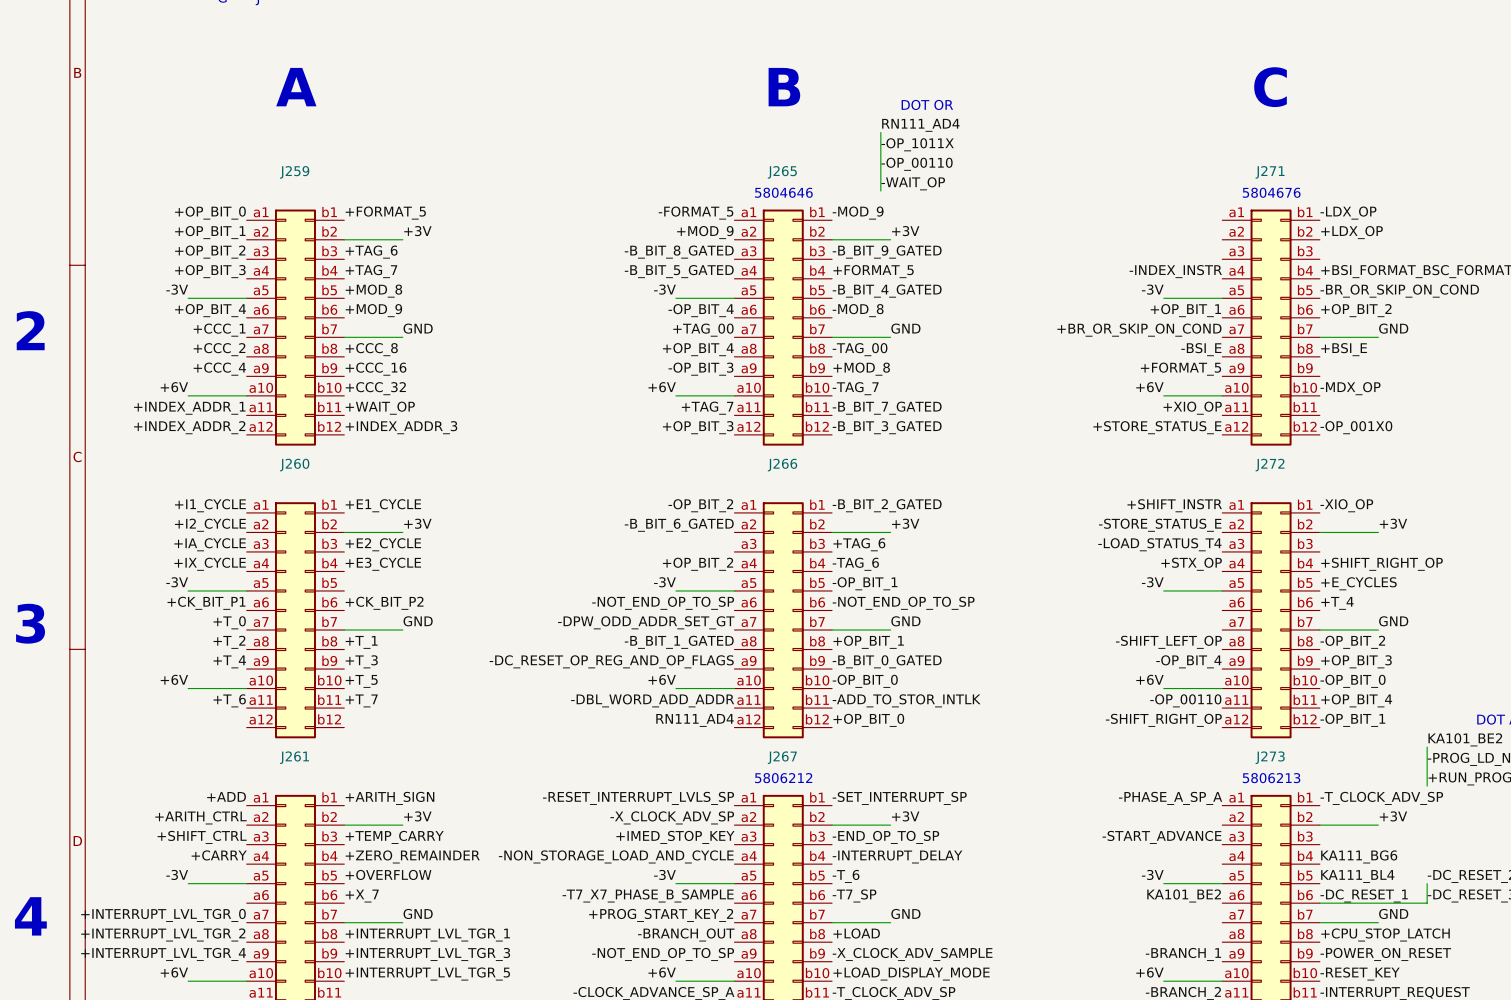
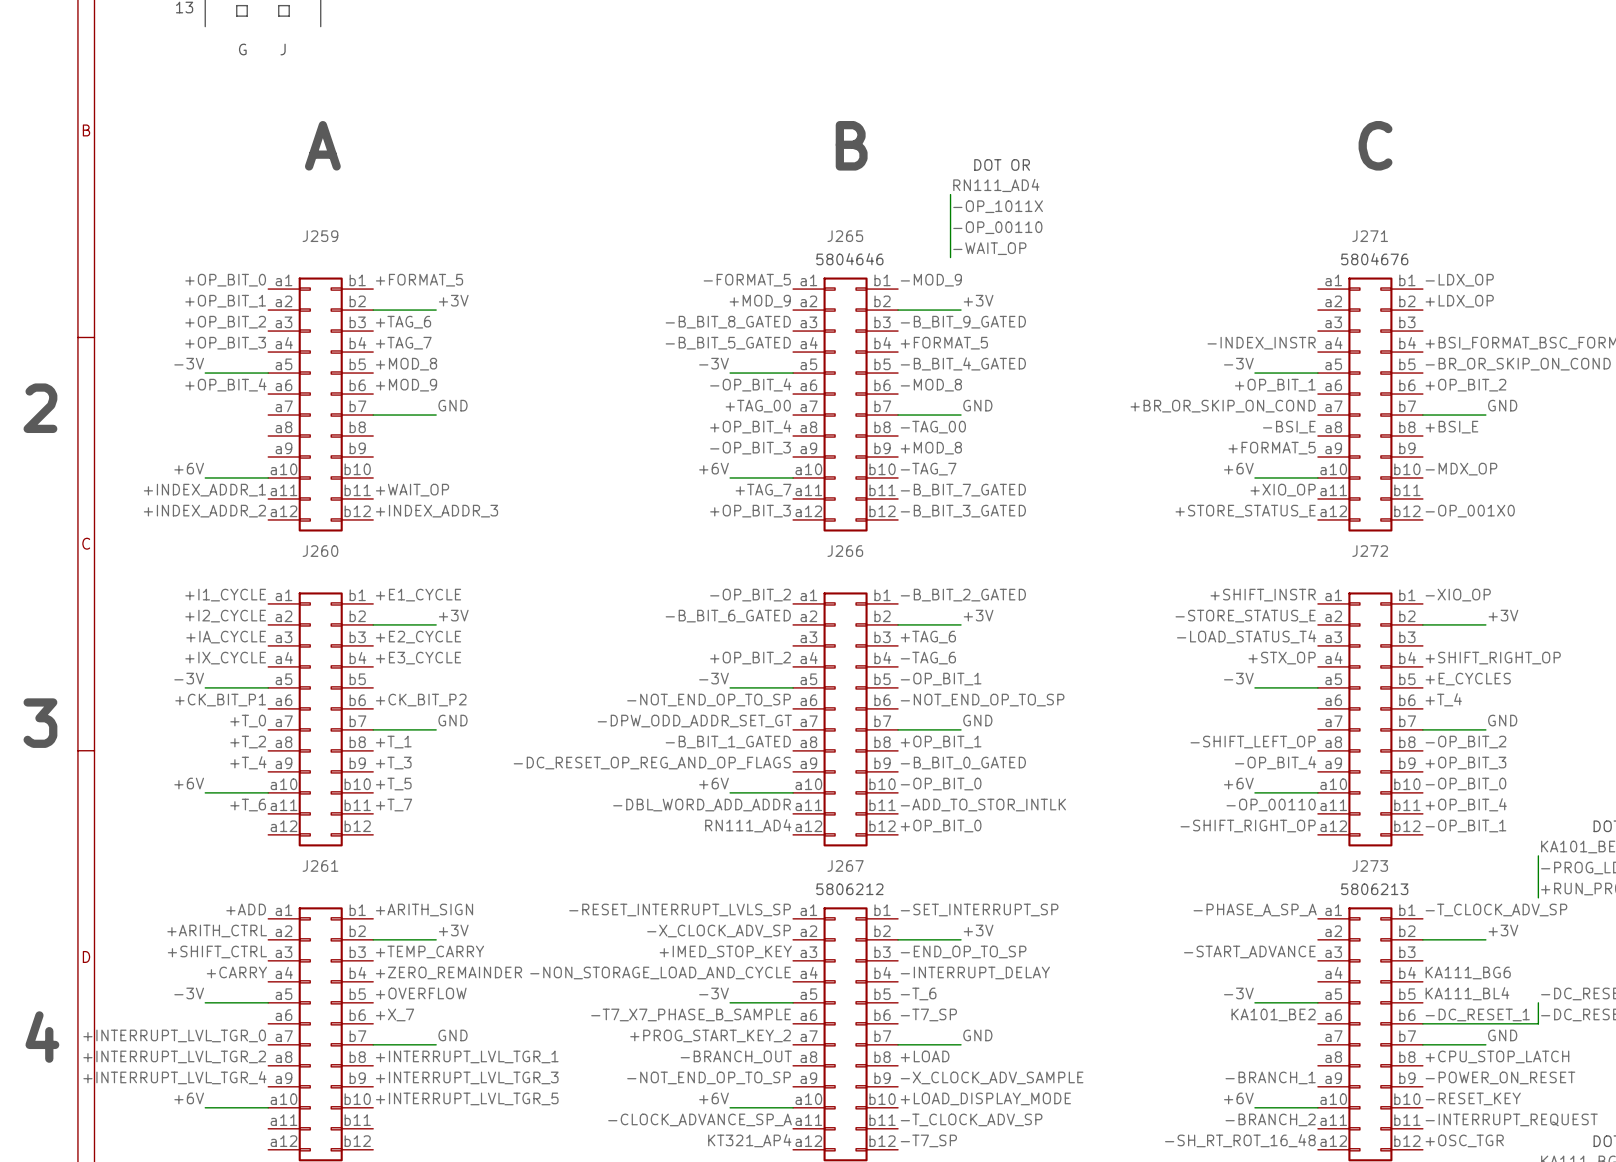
label: +CCC_1 (219, 330) -> none
label: +CCC_2 (219, 349) -> none
label: +CCC_8 (371, 349) -> none
label: +CCC_4 (219, 369) -> none
label: +CCC_16 (376, 369) -> none
label: +CCC_32 (375, 388) -> none

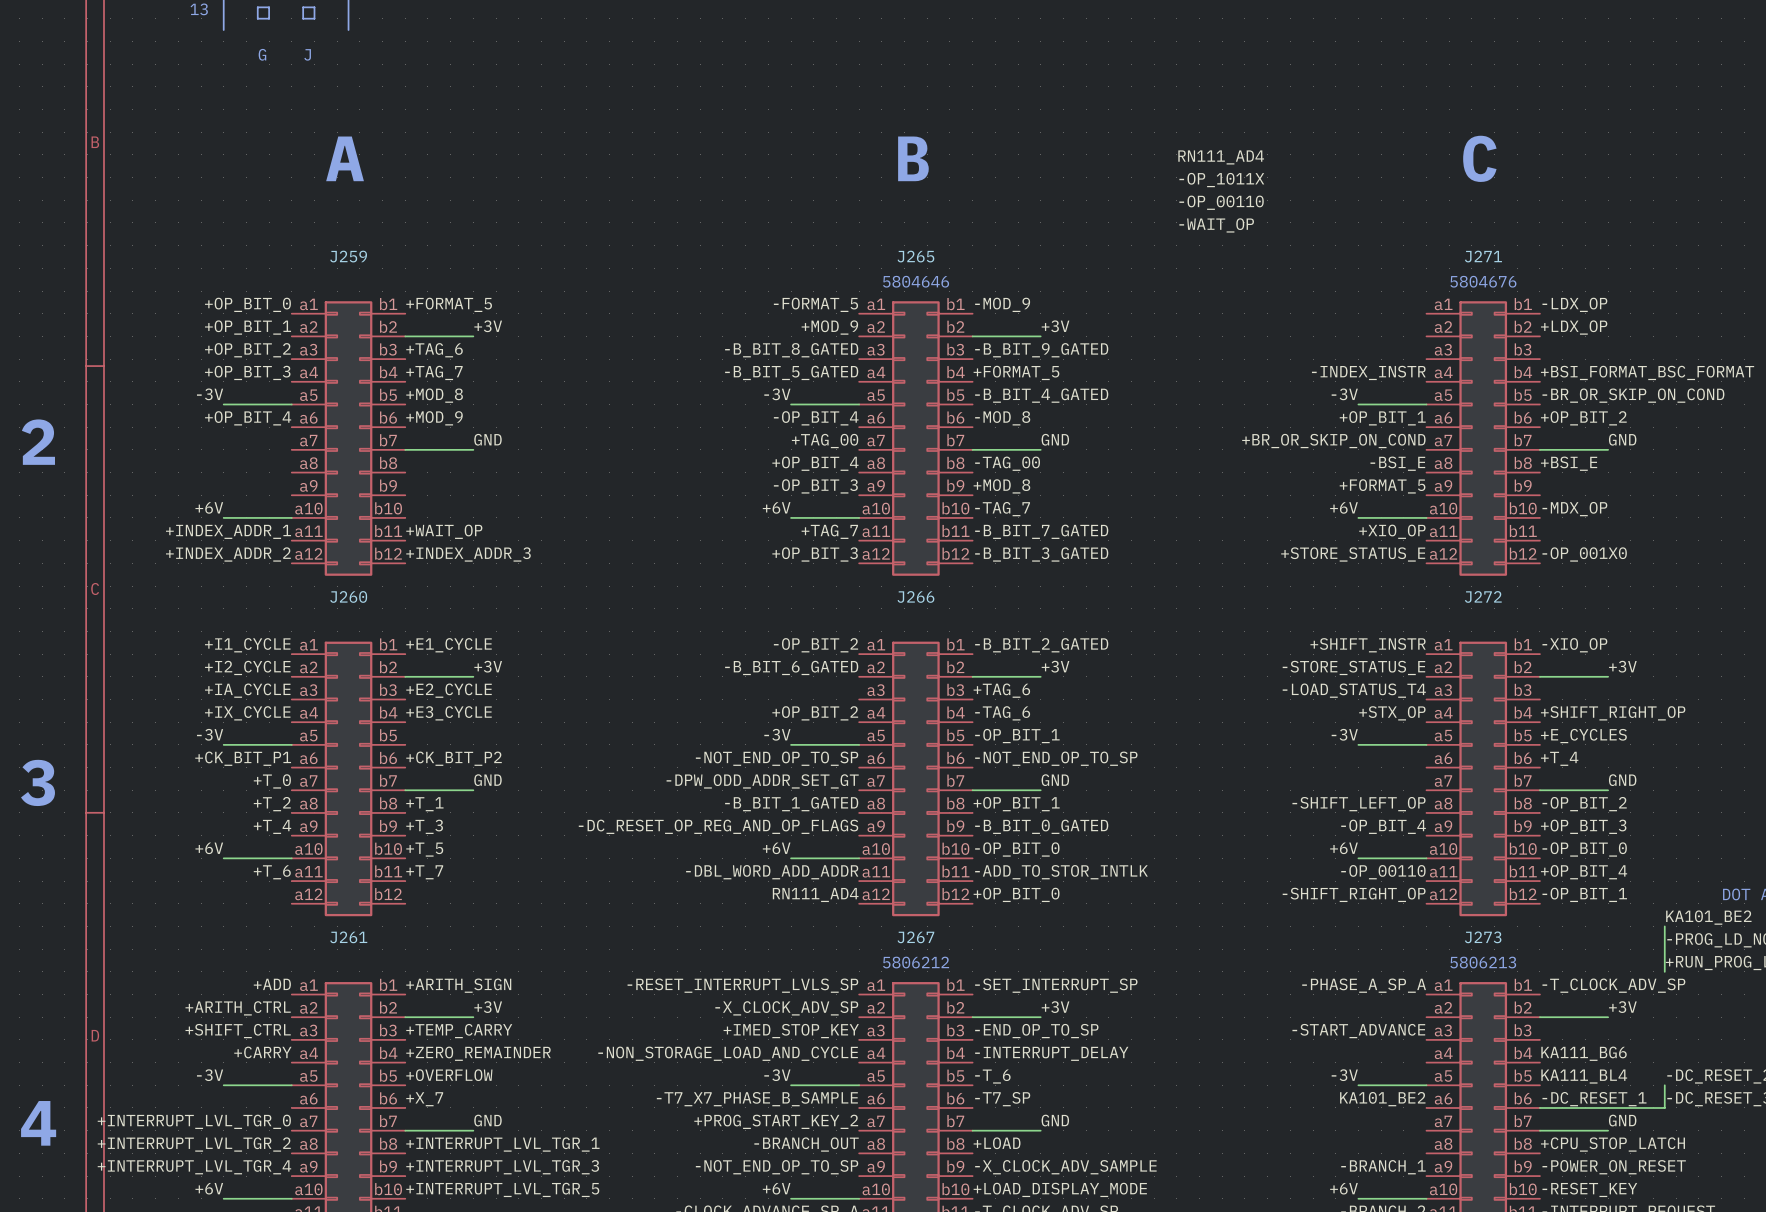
text: DOT OR (1002, 164) -> none
label position: RN111_AD4 (996, 185) -> RN111_AD4 (1221, 157)
wire: (950, 194) (950, 257) -> none
label position: -OP_1011X (998, 206) -> -OP_1011X (1221, 180)
label position: -OP_00110 (997, 227) -> -OP_00110 (1221, 202)
label position: -WAIT_OP (989, 248) -> -WAIT_OP (1216, 225)

